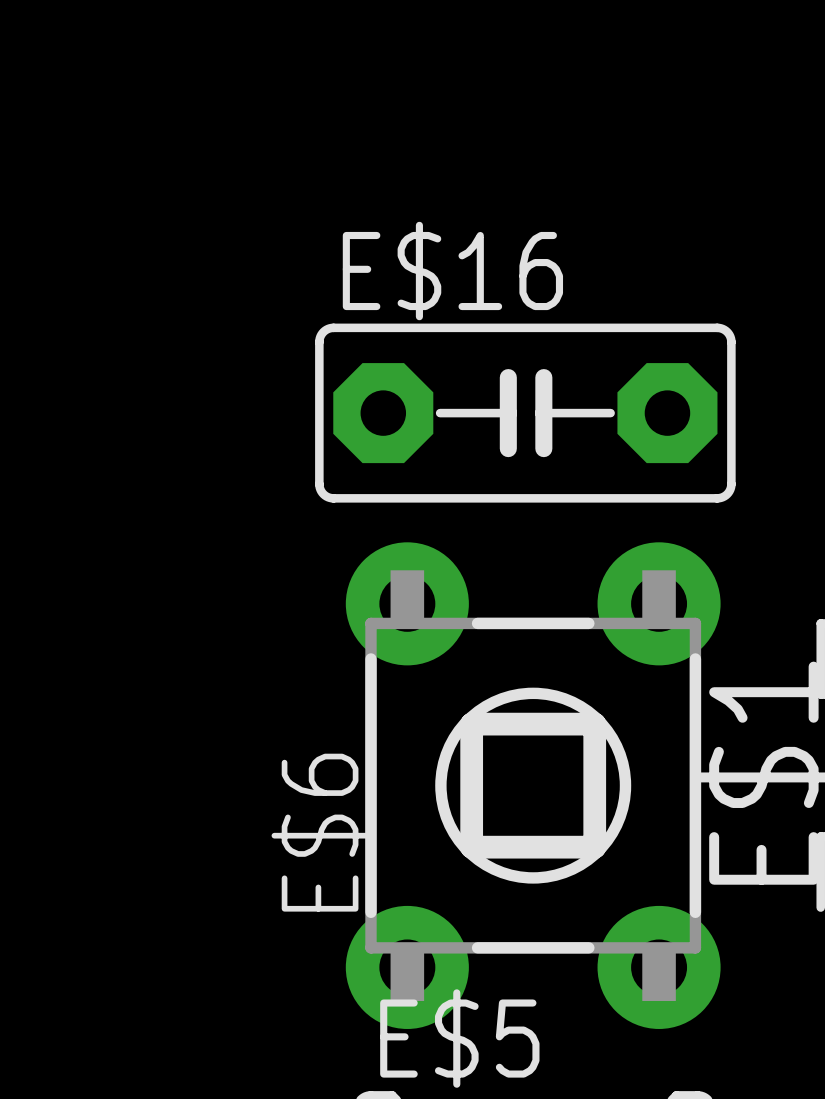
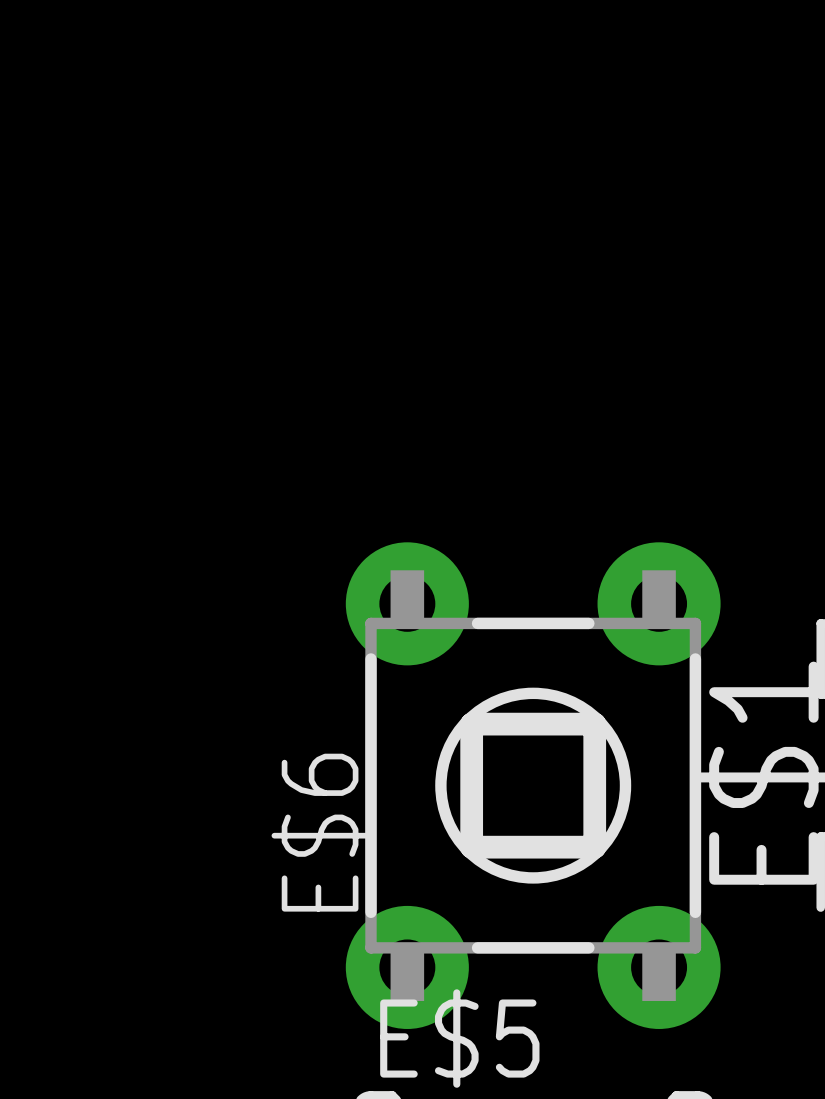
E$16: (525, 413) -> none

